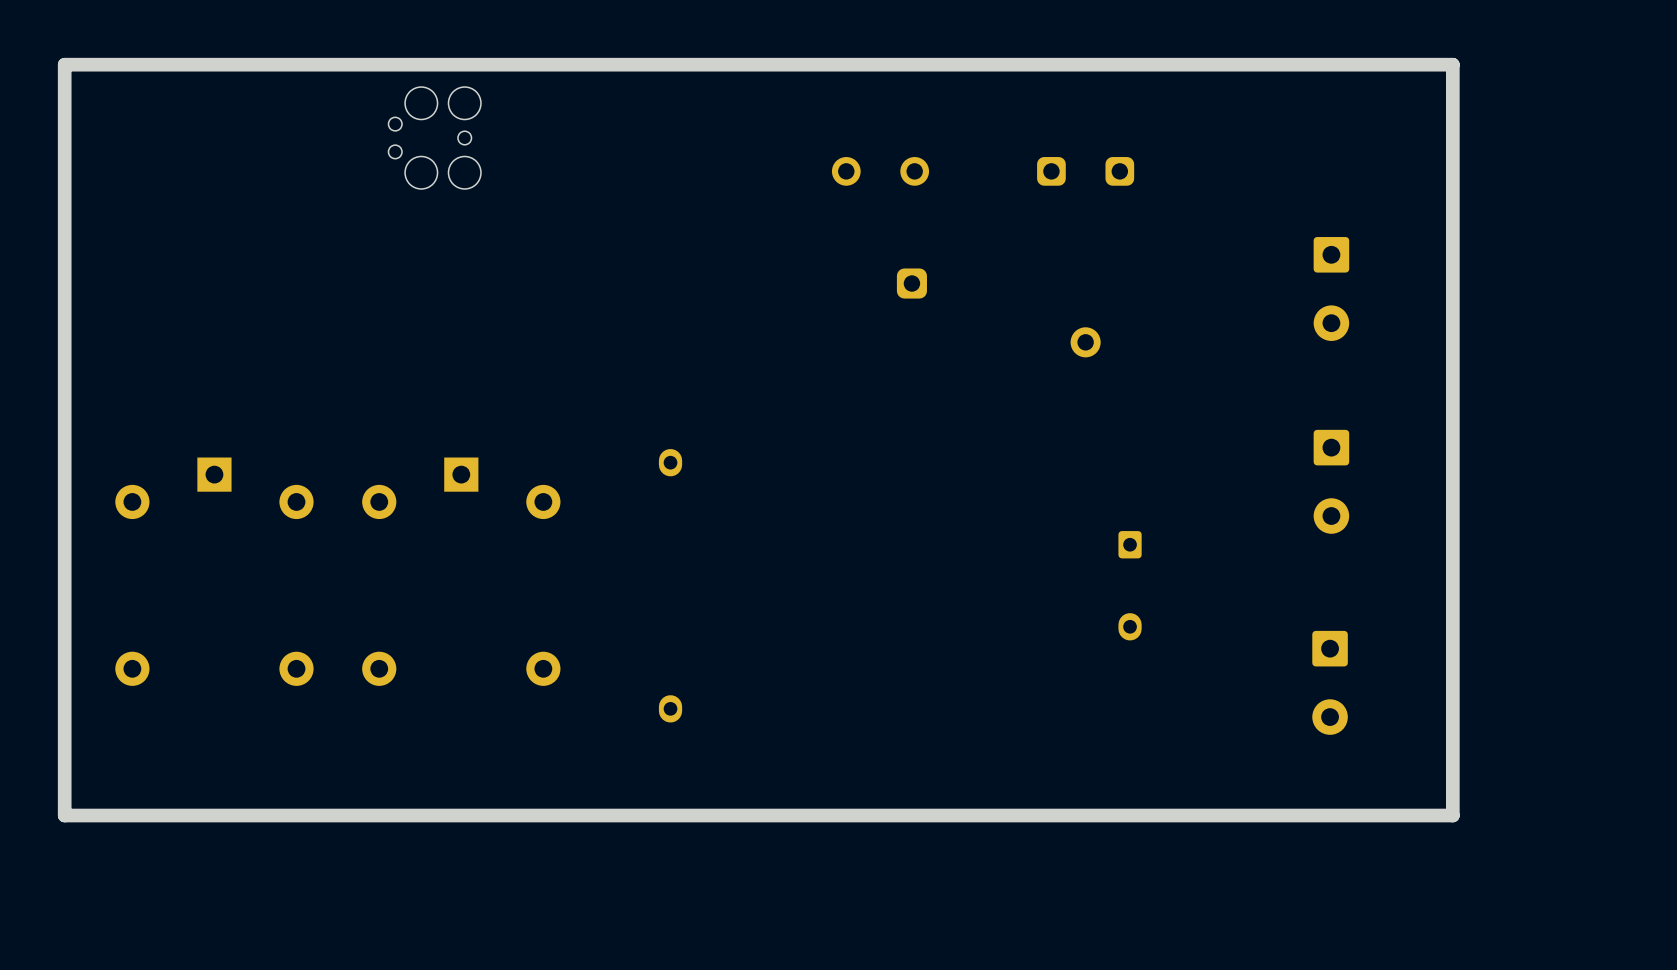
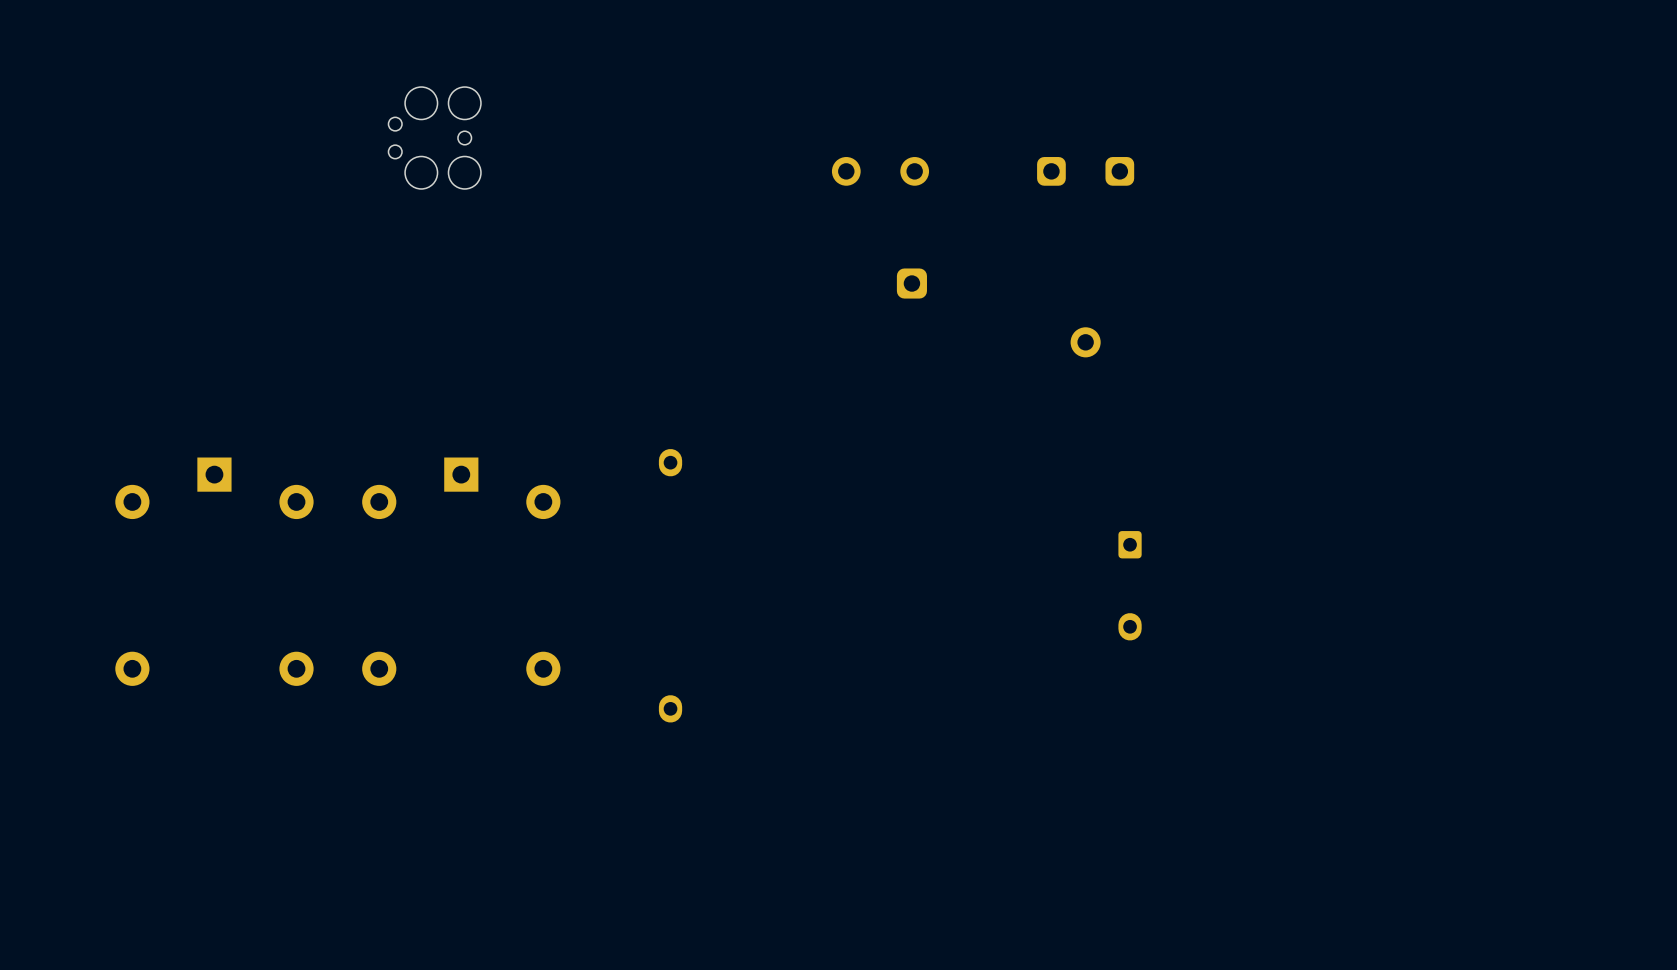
board edge: (1452, 64) (64, 64) (64, 815) (1452, 815) (1452, 64) -> none
part: (1331, 288) -> none
part: (1331, 481) -> none
part: (1330, 682) -> none

